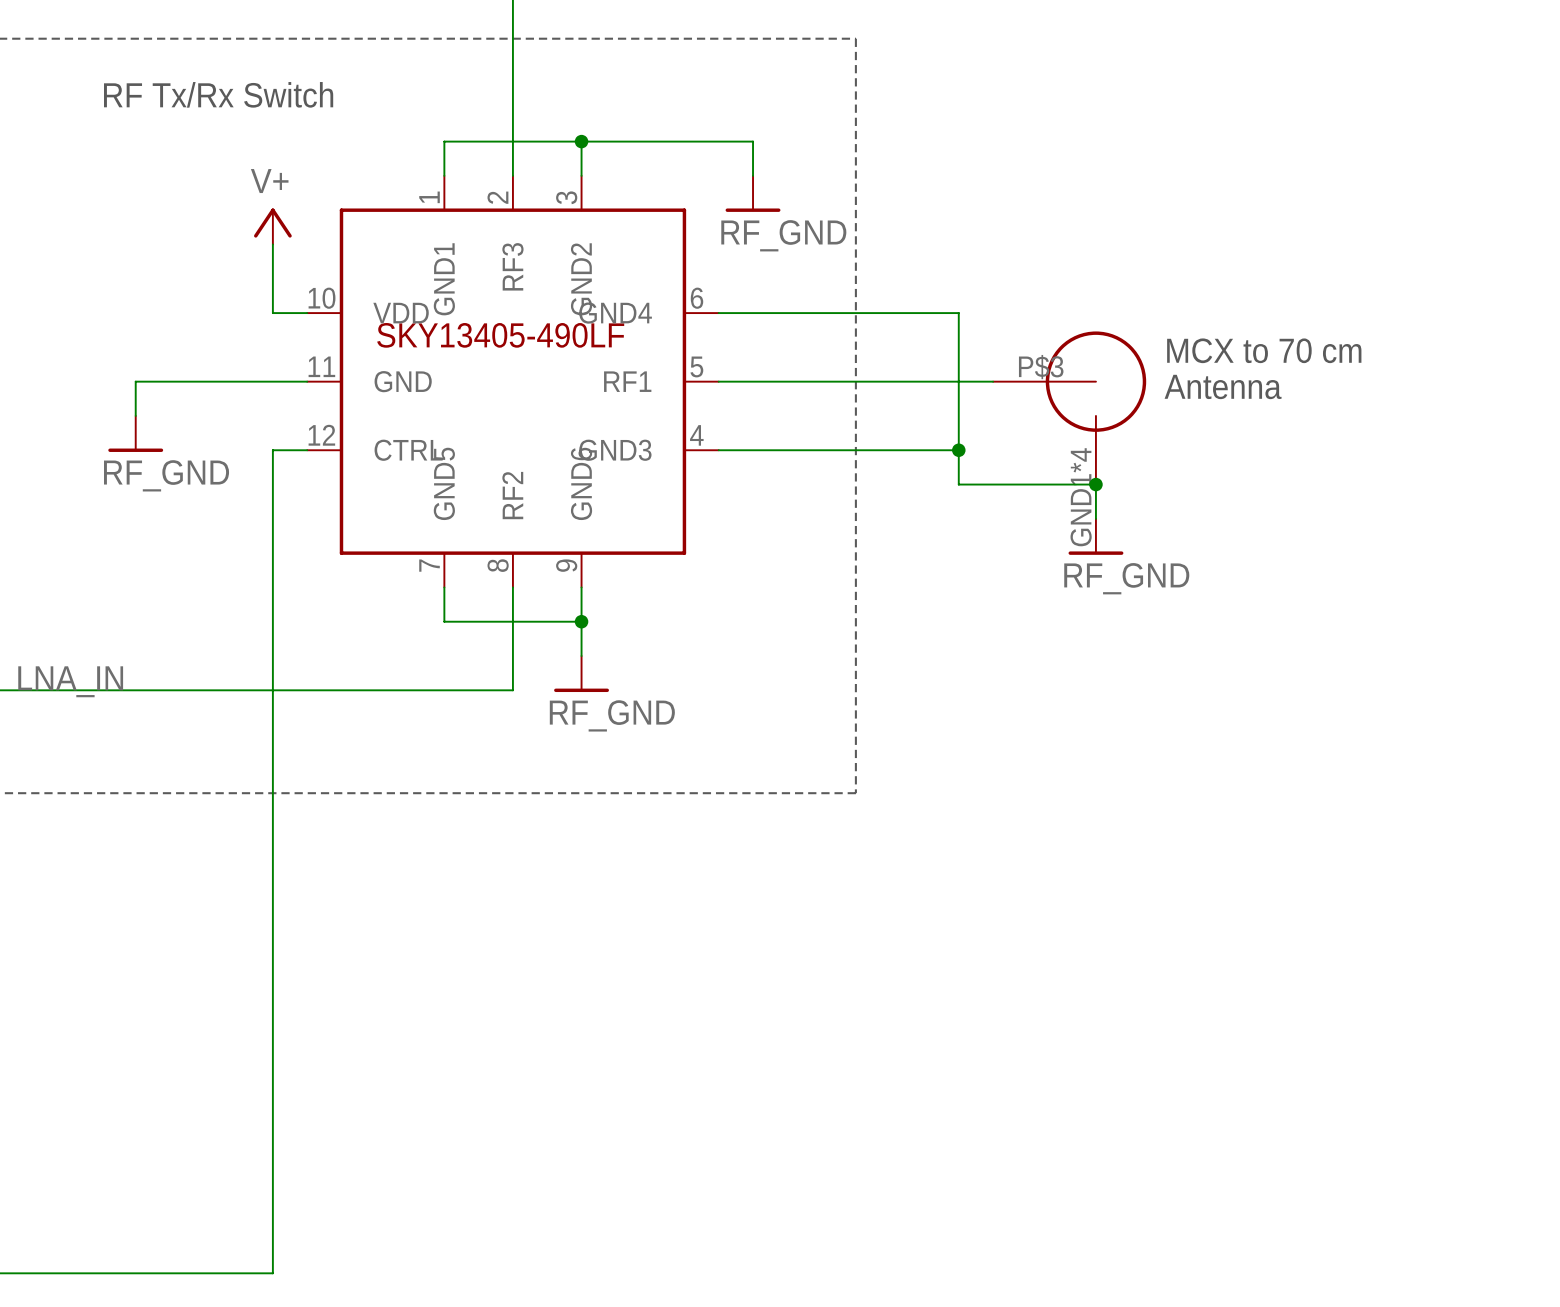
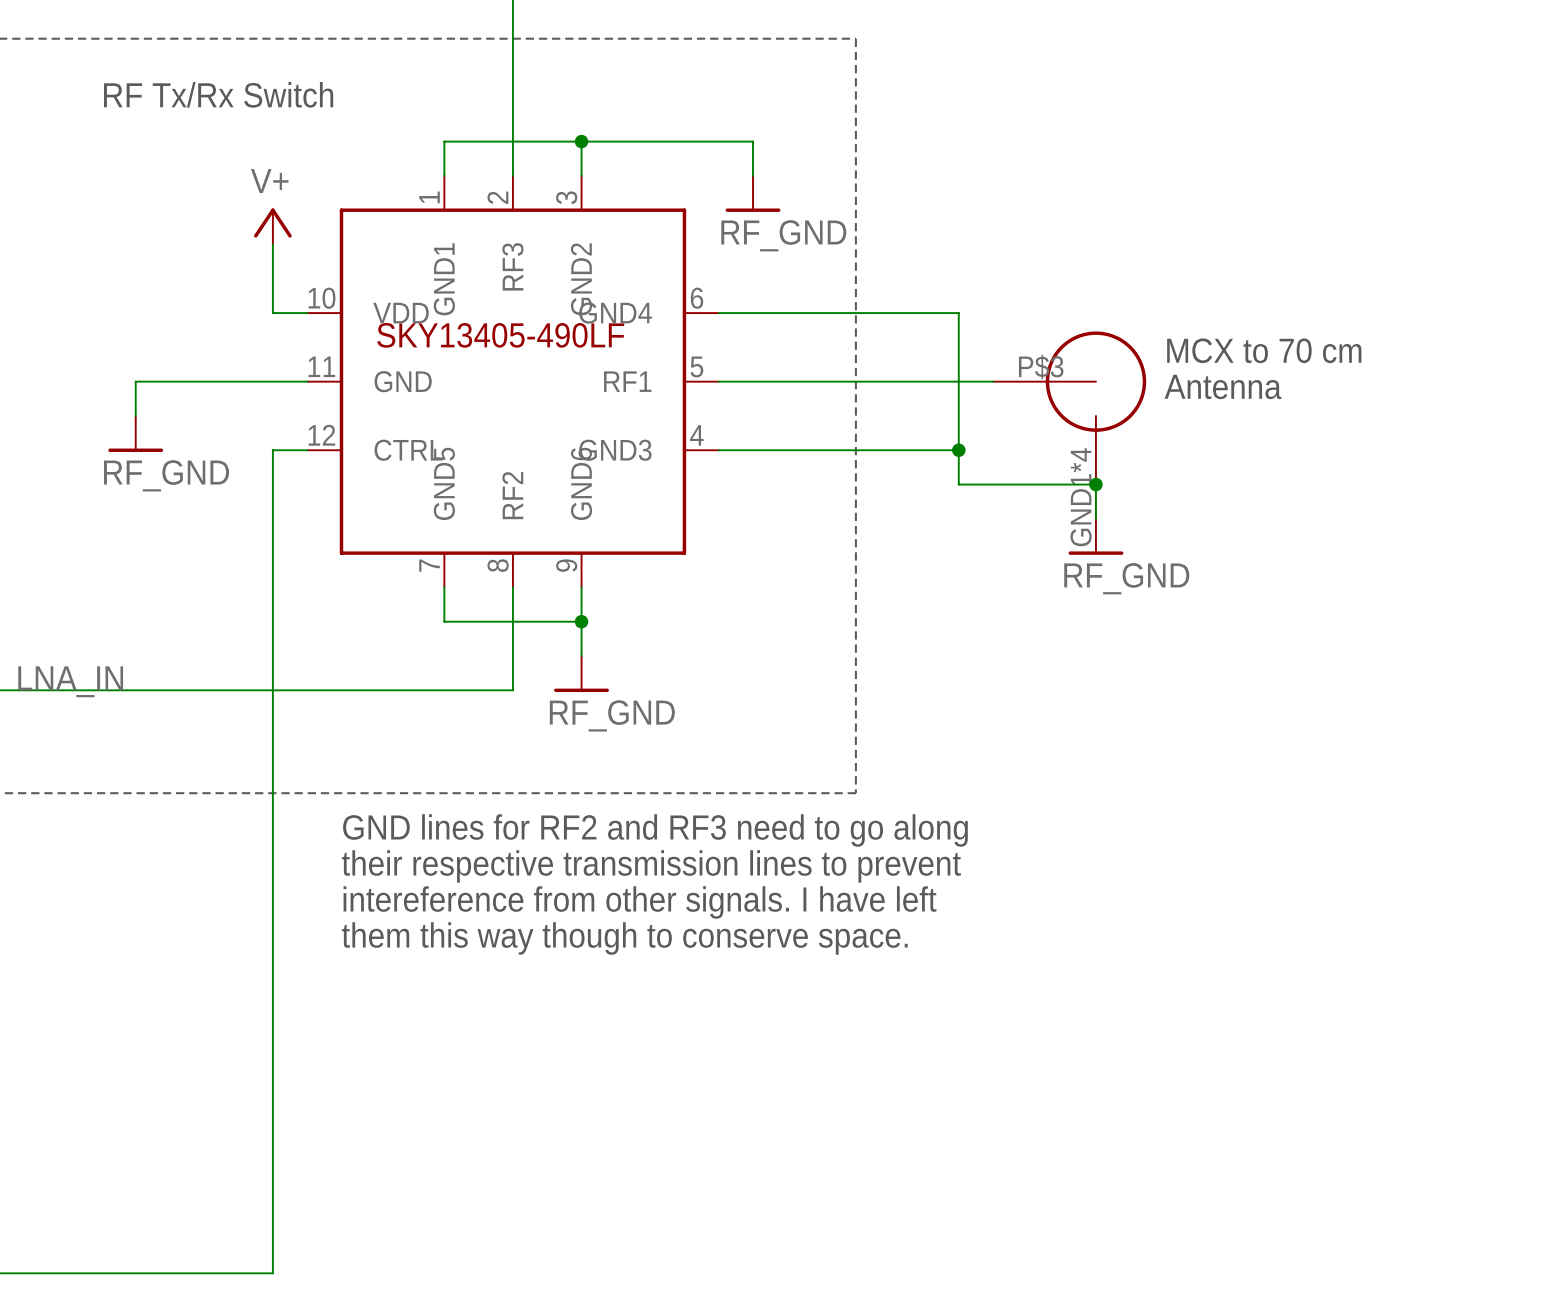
text: none -> GND lines for RF2 and RF3 need to go along (655, 830)
text: none -> their respective transmission lines to prevent (651, 866)
text: none -> intereference from other signals. I have left (640, 902)
text: none -> them this way though to conserve space. (624, 938)

